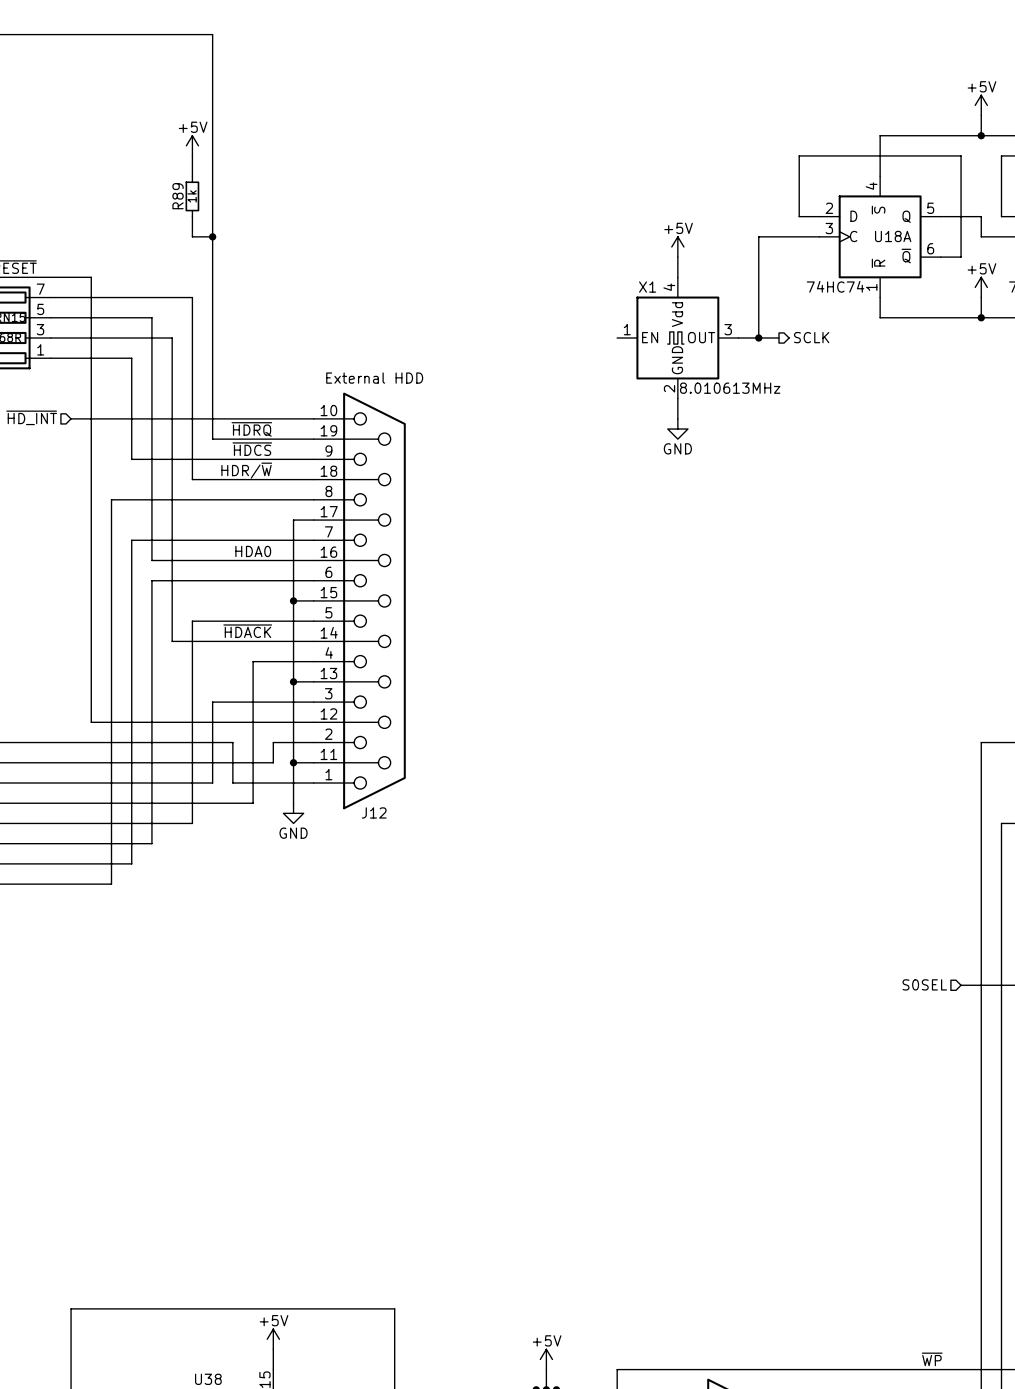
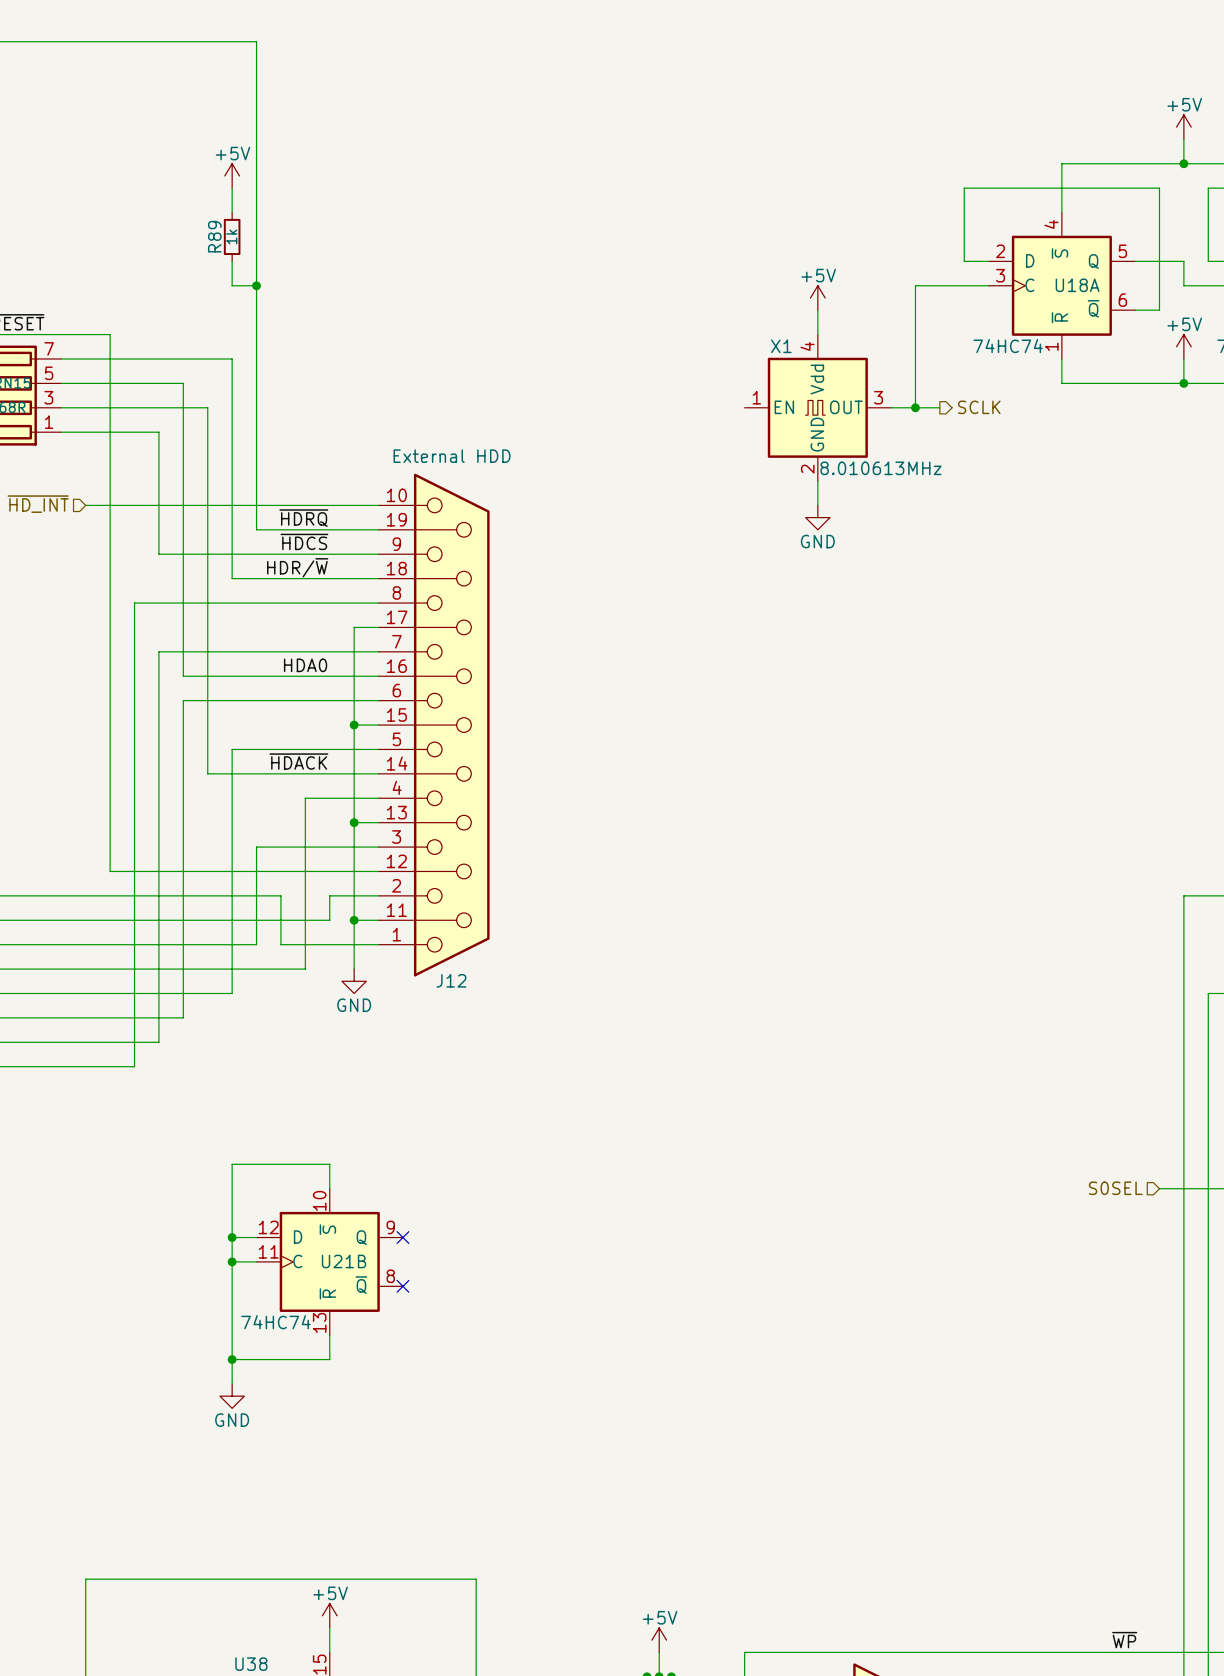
wire: none -> (329, 1188) (329, 1164) (232, 1164) (232, 1383)
wire: none -> (232, 1237) (256, 1237)
junction: none -> (232, 1237)
no-connect mark: none -> (402, 1237)
wire: none -> (232, 1261) (256, 1261)
junction: none -> (232, 1261)
U21B: none -> 74HC74 (329, 1261)
no-connect mark: none -> (402, 1286)
wire: none -> (329, 1335) (329, 1359) (232, 1359)
junction: none -> (232, 1359)
power symbol: none -> GND (232, 1396)

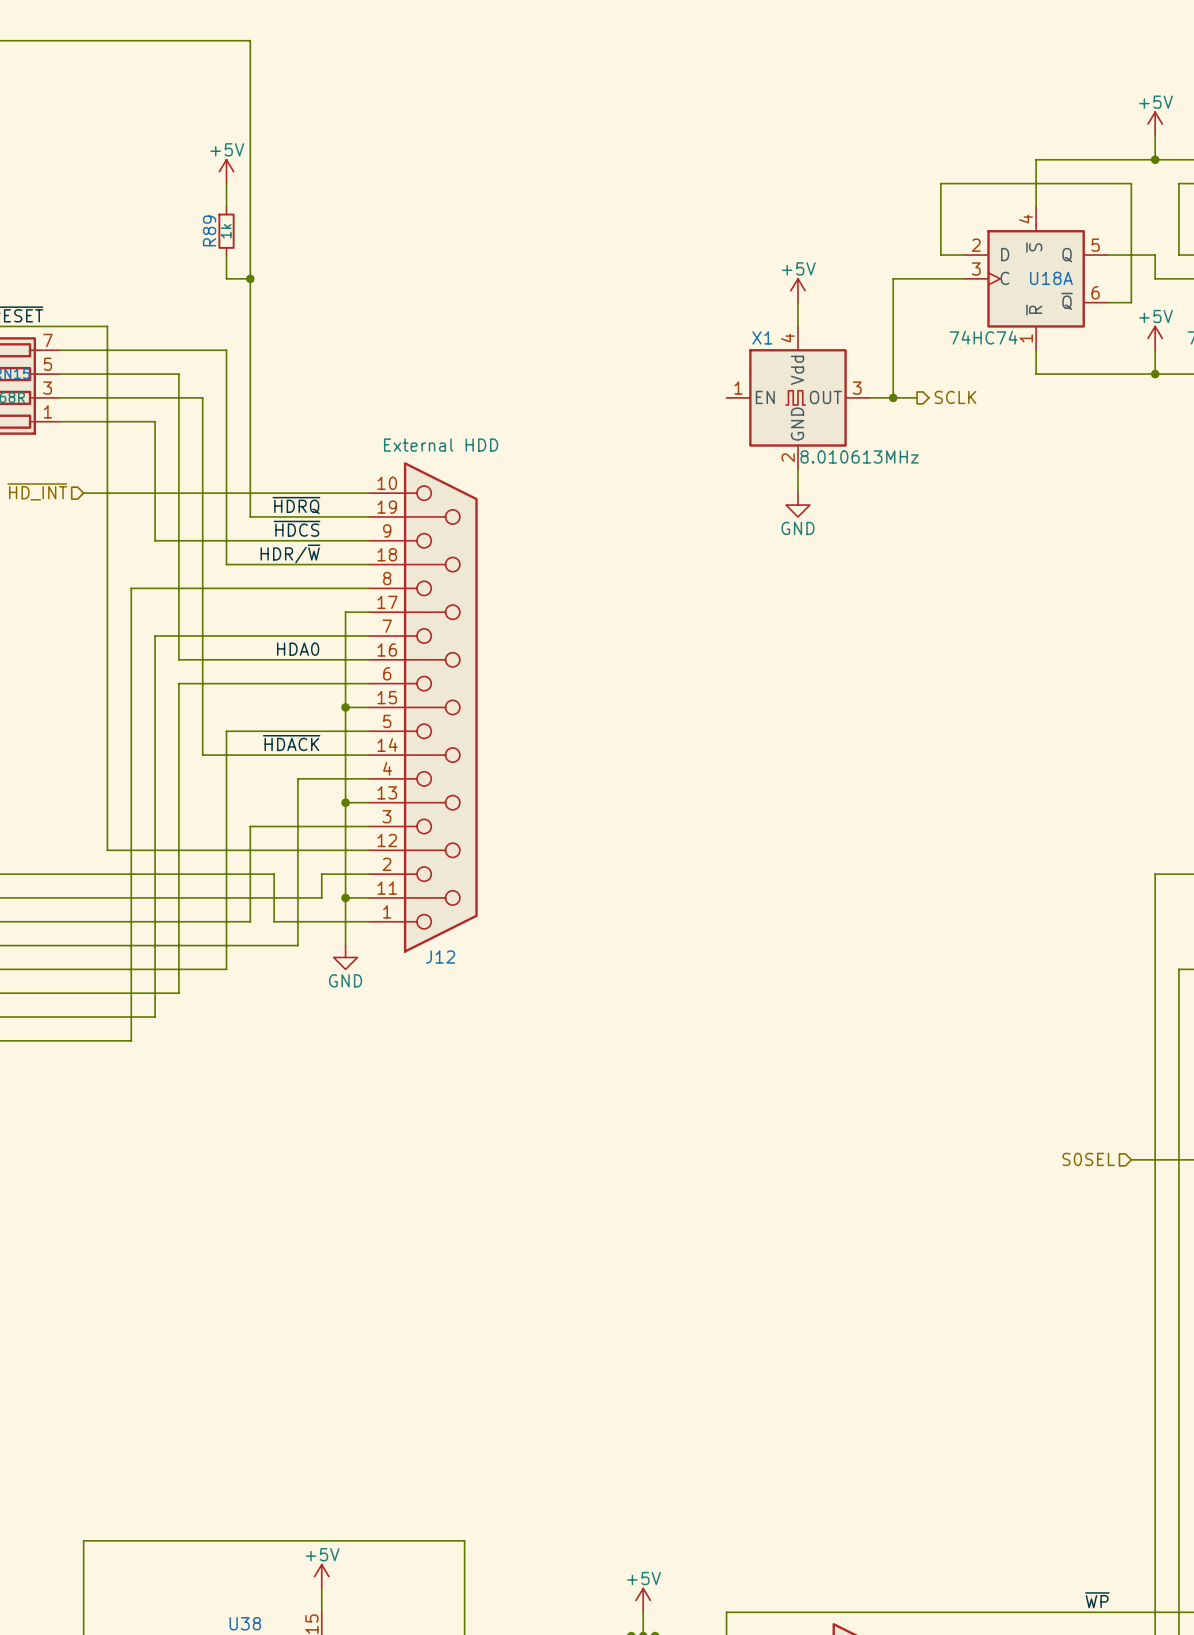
wire: (329, 1188) (329, 1164) (232, 1164) (232, 1383) -> none
wire: (232, 1237) (256, 1237) -> none
junction: (232, 1237) -> none
no-connect mark: (402, 1237) -> none
wire: (232, 1261) (256, 1261) -> none
junction: (232, 1261) -> none
U21B: 74HC74 (329, 1261) -> none
no-connect mark: (402, 1286) -> none
wire: (329, 1335) (329, 1359) (232, 1359) -> none
junction: (232, 1359) -> none
power symbol: GND (232, 1396) -> none

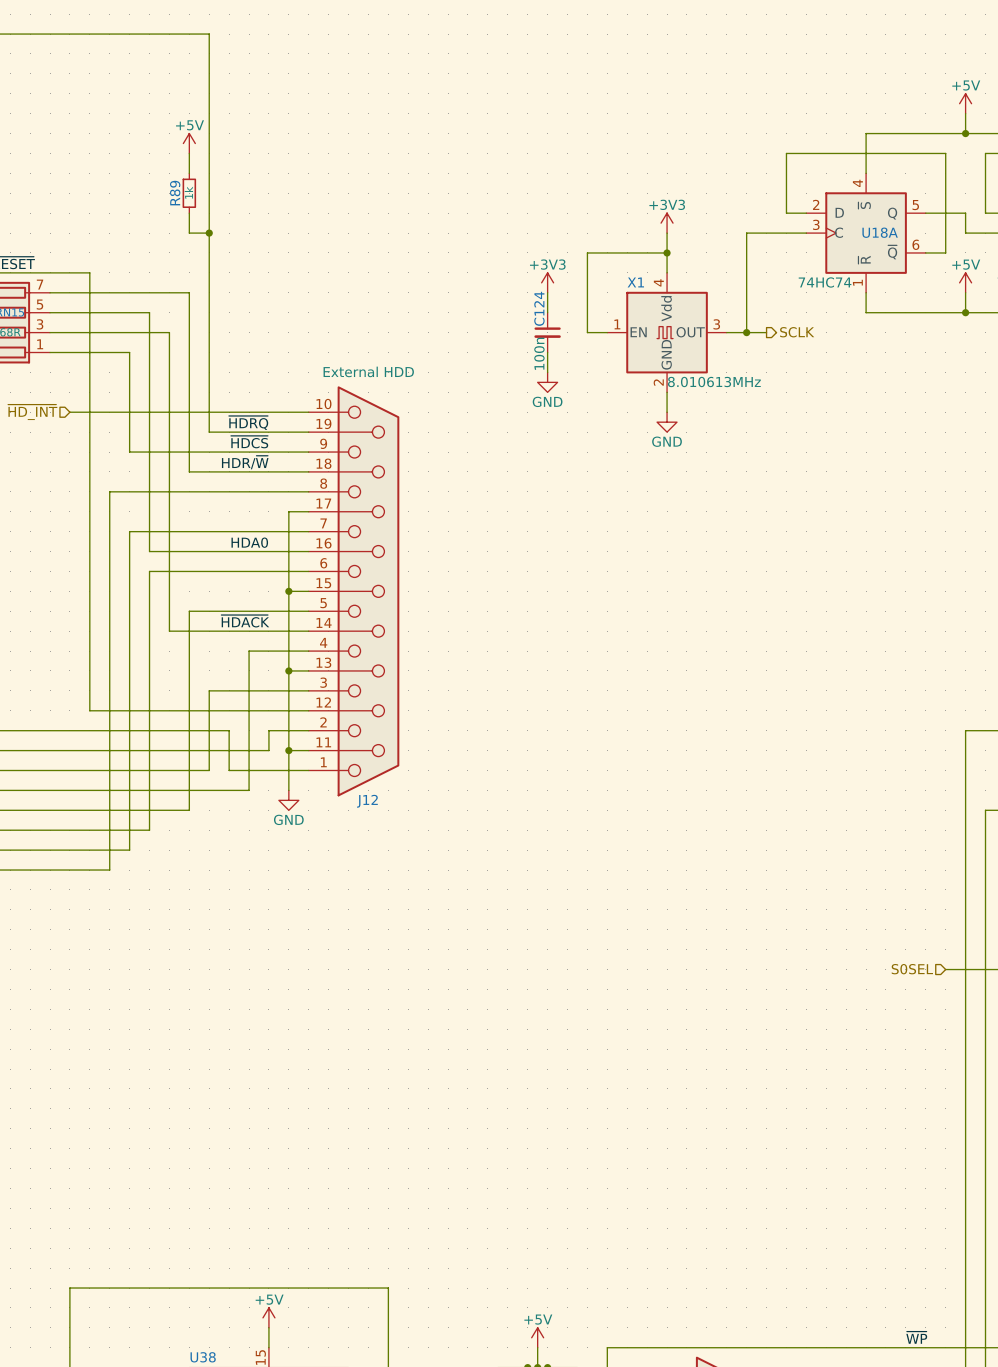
power symbol: none -> +3V3 (667, 223)
wire: none -> (667, 233) (667, 252) (587, 252) (587, 332) (607, 332)
power symbol: +5V (797, 290) -> none
junction: none -> (667, 252)
power symbol: none -> +3V3 (547, 282)
wire: none -> (547, 292) (547, 312)
C124: none -> 100n (547, 332)
wire: none -> (547, 352) (547, 372)
power symbol: none -> GND (547, 382)

